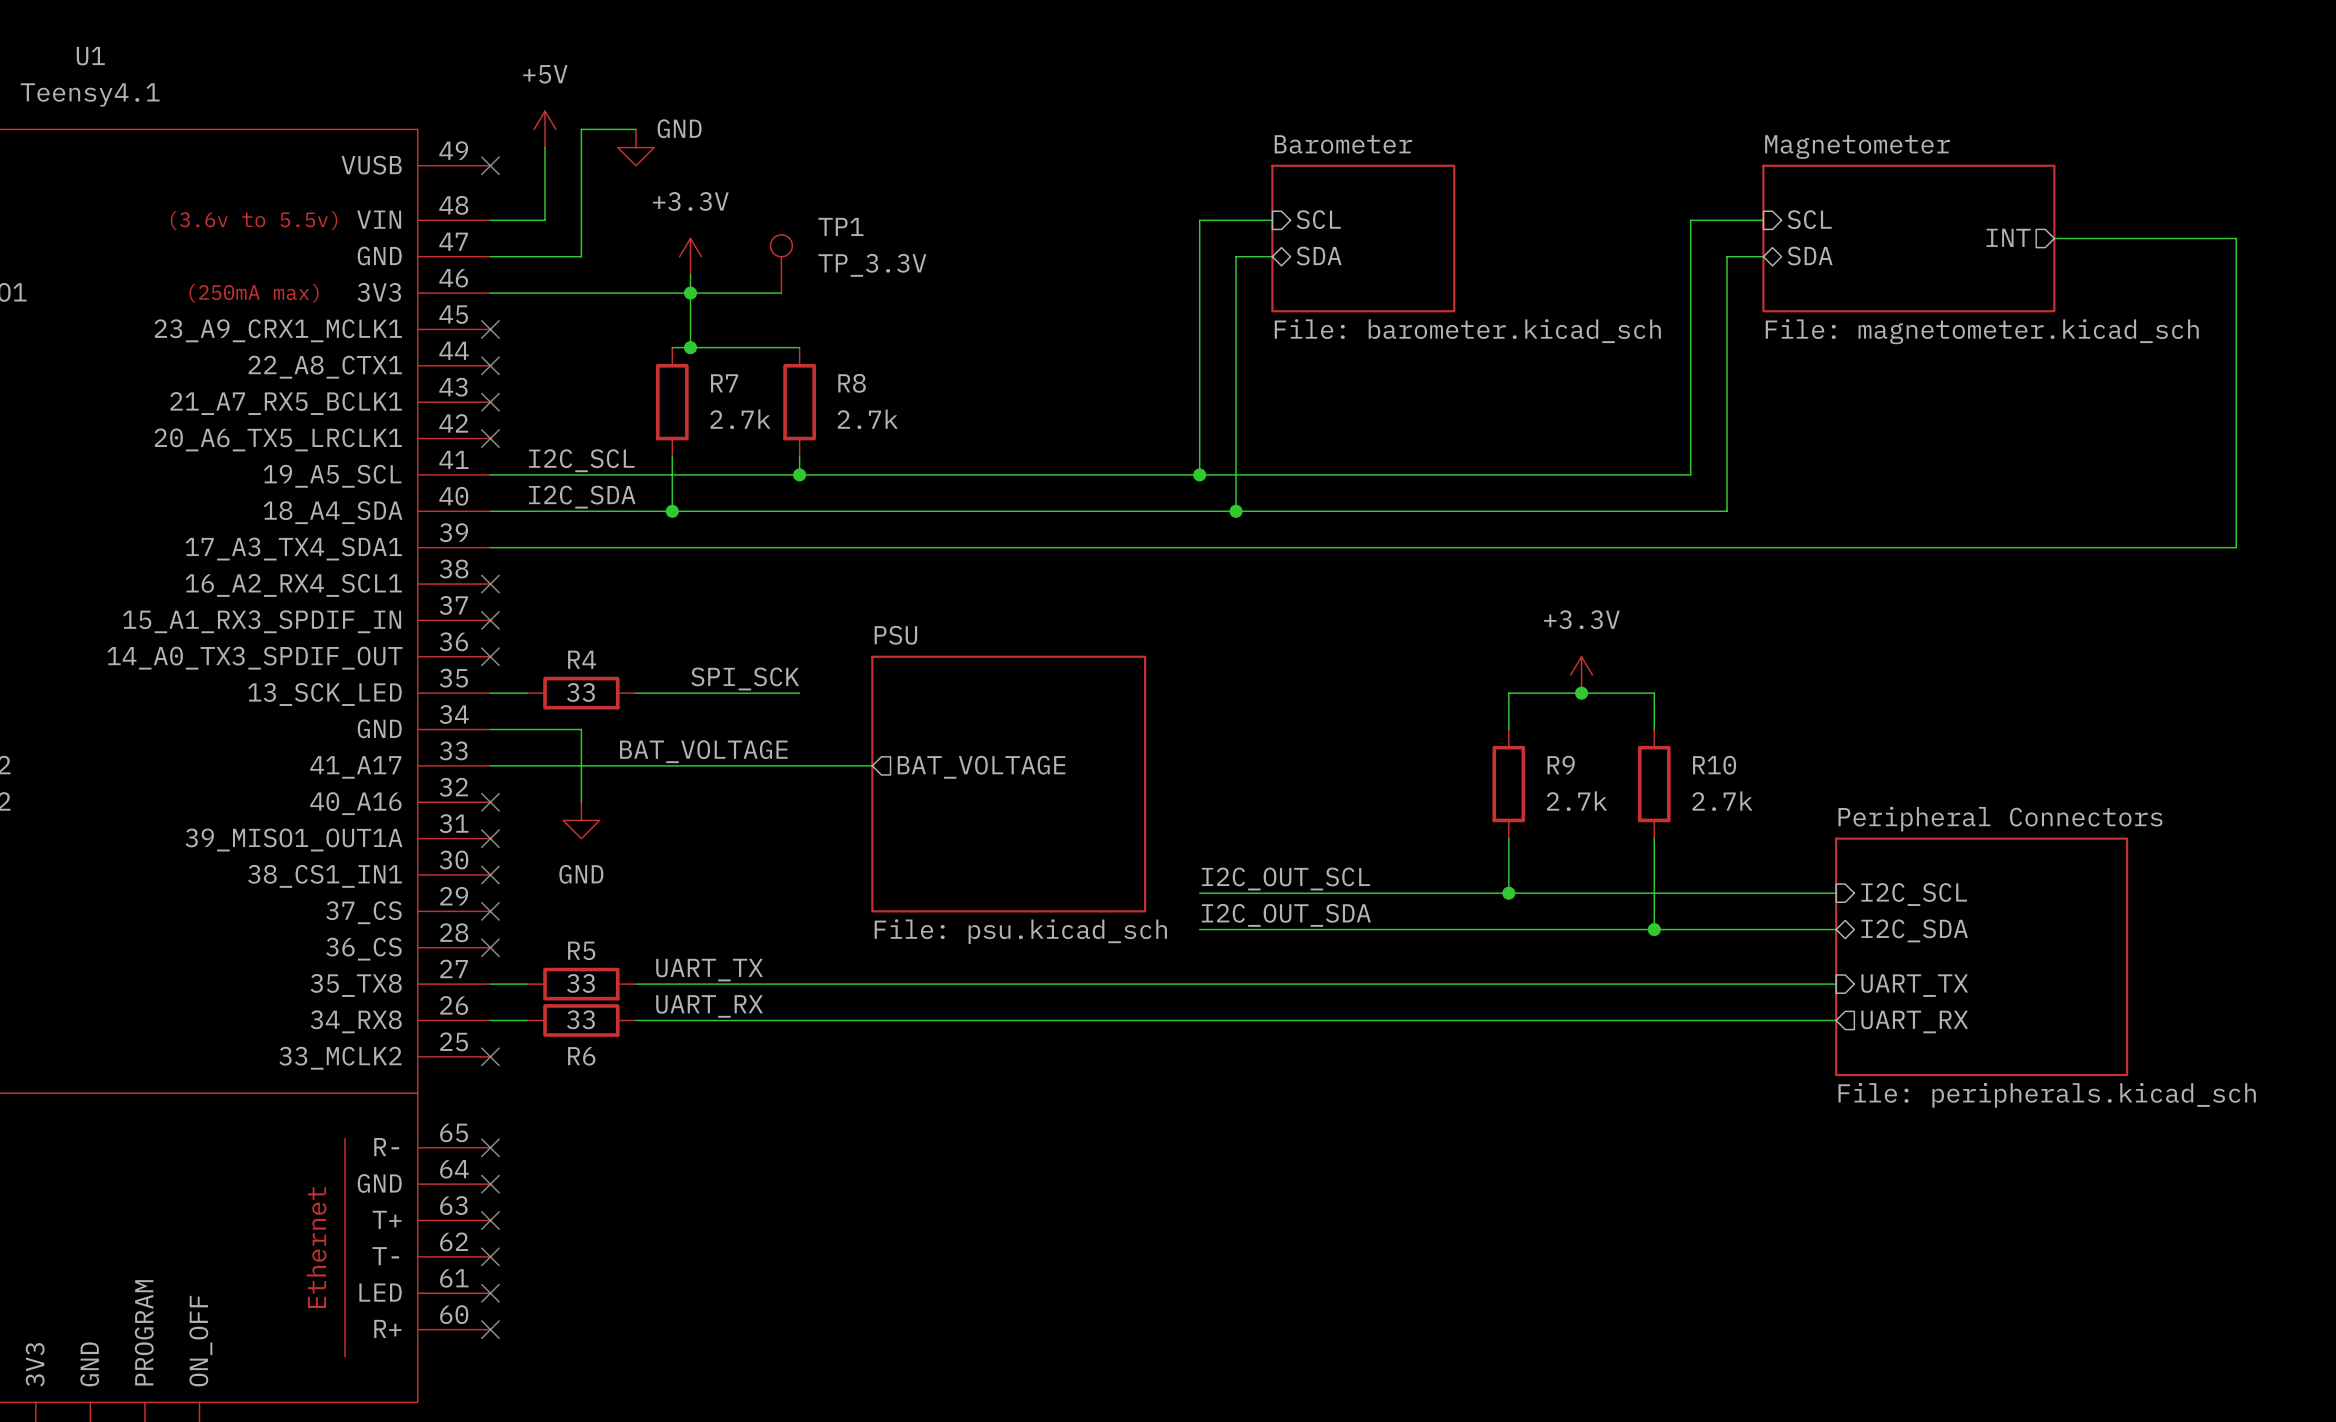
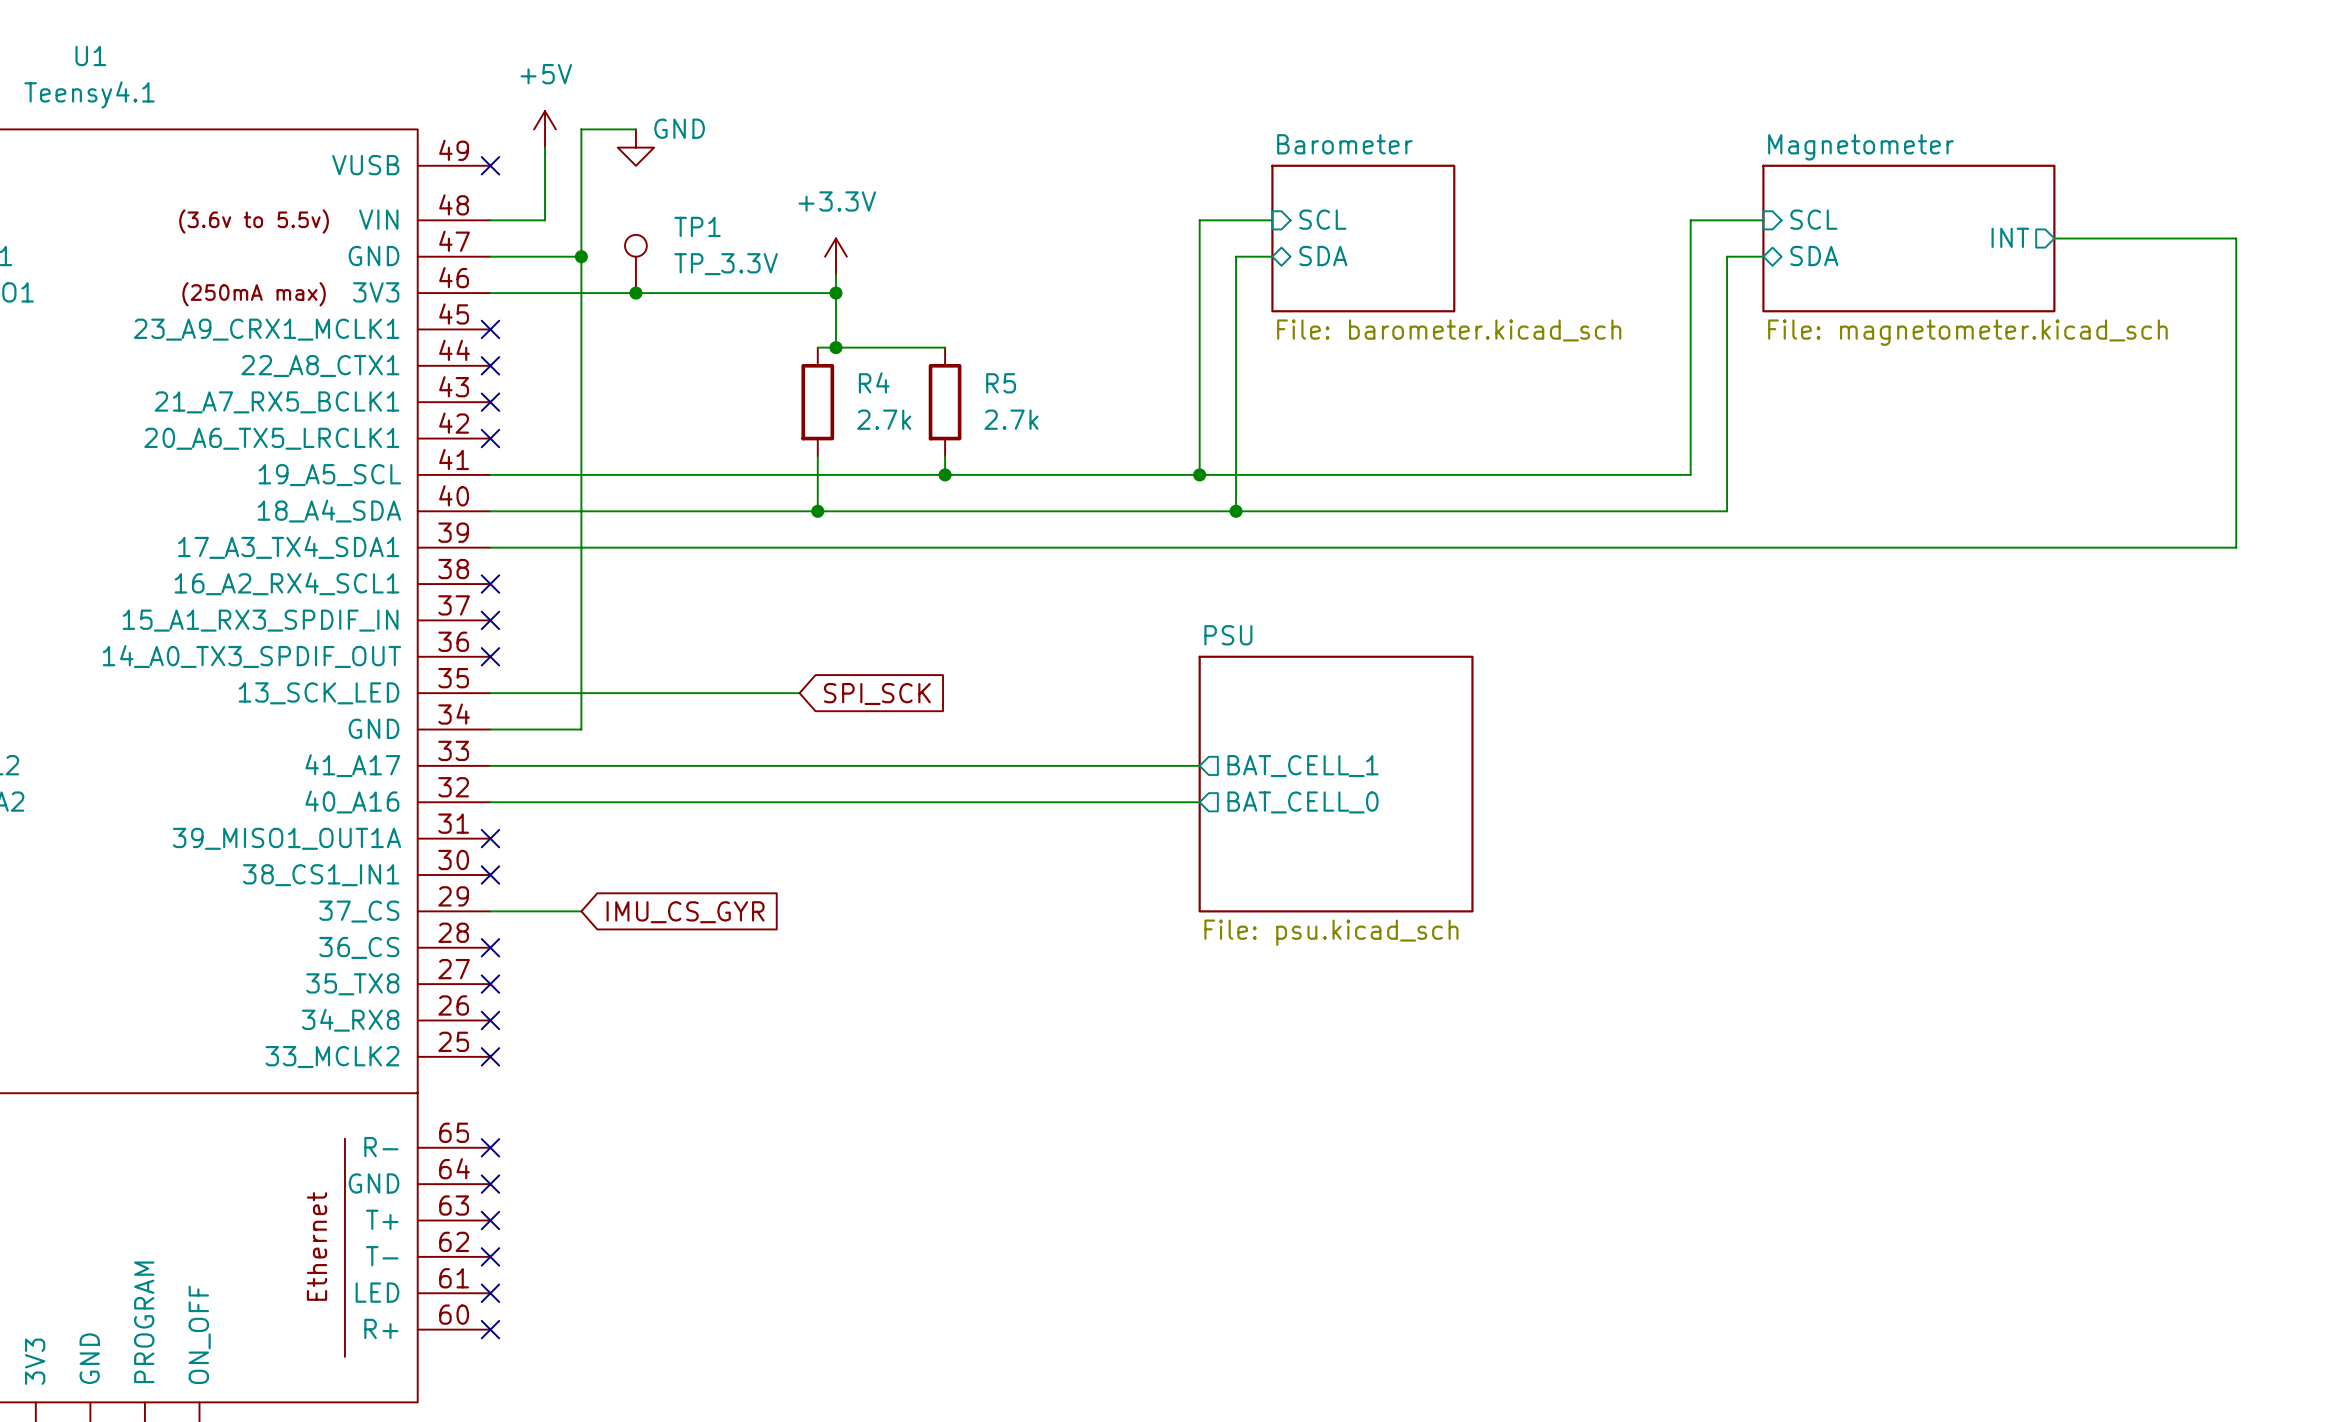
junction: none -> (581, 256)
power symbol position: +3.3V (690, 256) -> +3.3V (835, 256)
TP1 position: (781, 263) -> (635, 263)
wire: (690, 274) (690, 347) -> (835, 274) (835, 347)
junction: none -> (635, 293)
junction: (690, 293) -> none
wire: none -> (781, 293) (835, 293)
junction: none -> (835, 293)
wire: (672, 347) (799, 347) -> (817, 347) (945, 347)
junction: (690, 347) -> none
junction: none -> (835, 347)
R7: 2.7k (672, 402) -> none
R8: 2.7k (799, 402) -> none
wire: (672, 456) (672, 511) -> (817, 456) (817, 511)
wire: (799, 456) (799, 474) -> (945, 456) (945, 474)
label: I2C_SCL (581, 460) -> none
junction position: (799, 474) -> (817, 511)
junction: none -> (945, 474)
label: I2C_SDA (582, 497) -> none
junction: (672, 511) -> none
R4 name position: R4 (582, 659) -> R4 (874, 382)
power symbol: +3.3V (1581, 674) -> none
label: SPI_SCK (745, 678) -> none
R4 value: 33 (580, 692) -> 2.7k (884, 419)
wire: none -> (526, 693) (635, 693)
R4 rotation: 0° (581, 693) -> 90° clockwise (817, 402)
R4 position: (581, 693) -> (817, 402)
junction: (1581, 693) -> none
global label: none -> SPI_SCK (877, 694)
wire: (581, 729) (581, 802) -> (581, 729) (581, 256)
wire: (1508, 729) (1508, 693) (1654, 693) (1654, 729) -> none
label: BAT_VOLTAGE (703, 751) -> none
wire: none -> (872, 765) (1199, 765)
sheet pin: BAT_VOLTAGE (981, 767) -> none
sheet pin: none -> BAT_CELL_1 (1303, 766)
sheet PSU position: (1008, 784) -> (1336, 784)
R9: 2.7k (1508, 784) -> none
R10: 2.7k (1654, 784) -> none
wire: none -> (490, 802) (1199, 802)
no-connect mark: (490, 802) -> none
sheet pin: none -> BAT_CELL_0 (1303, 802)
power symbol: GND (581, 820) -> none
wire: (1508, 838) (1508, 893) -> none
wire: (1654, 838) (1654, 929) -> none
label: I2C_OUT_SCL (1285, 879) -> none
wire: (1199, 893) (1836, 893) -> none
junction: (1508, 893) -> none
sheet pin: I2C_SCL (1914, 894) -> none
wire: none -> (490, 911) (581, 911)
no-connect mark: (490, 911) -> none
global label: none -> IMU_CS_GYR (685, 912)
label: I2C_OUT_SDA (1286, 915) -> none
wire: (1199, 929) (1836, 929) -> none
junction: (1654, 929) -> none
sheet pin: I2C_SDA (1914, 930) -> none
R5 name position: R5 (581, 950) -> R5 (1001, 383)
sheet Peripheral Connectors: File: peripherals.kicad_sch (1981, 956) -> none
label: UART_TX (709, 970) -> none
R5 value: 33 (580, 983) -> 2.7k (1011, 419)
wire: (490, 984) (526, 984) -> none
no-connect mark: none -> (490, 984)
R5 rotation: 0° (581, 984) -> 90° clockwise (945, 402)
R5 position: (581, 984) -> (945, 402)
wire: (635, 984) (1836, 984) -> none
sheet pin: UART_TX (1914, 985) -> none
label: UART_RX (709, 1006) -> none
wire: (490, 1020) (526, 1020) -> none
no-connect mark: none -> (490, 1020)
R6: 33 (581, 1020) -> none
wire: (635, 1020) (1836, 1020) -> none
sheet pin: UART_RX (1914, 1022) -> none

